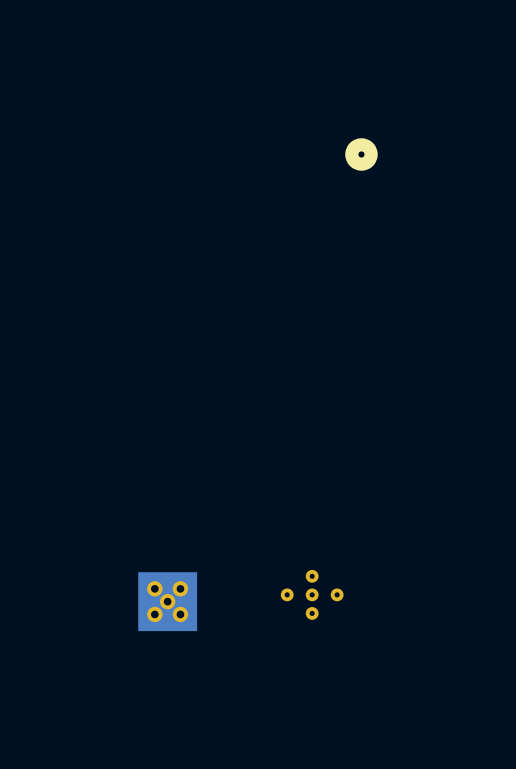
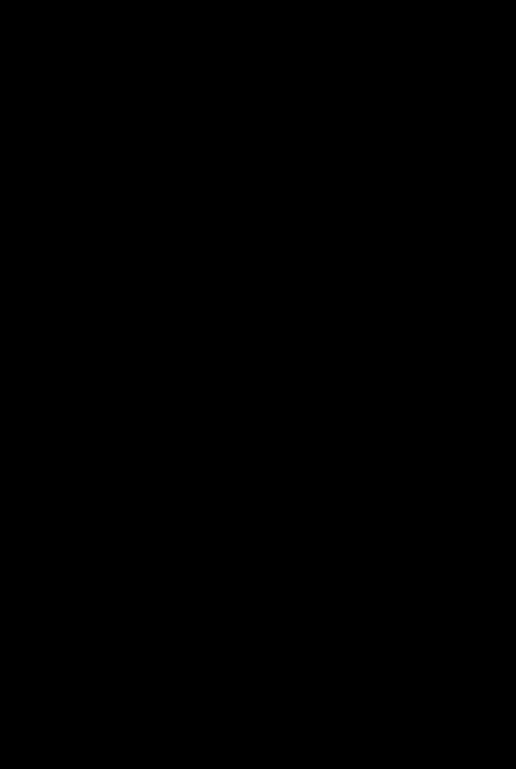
part: (361, 154) -> none
part: (312, 594) -> none
part: (167, 601) -> none

